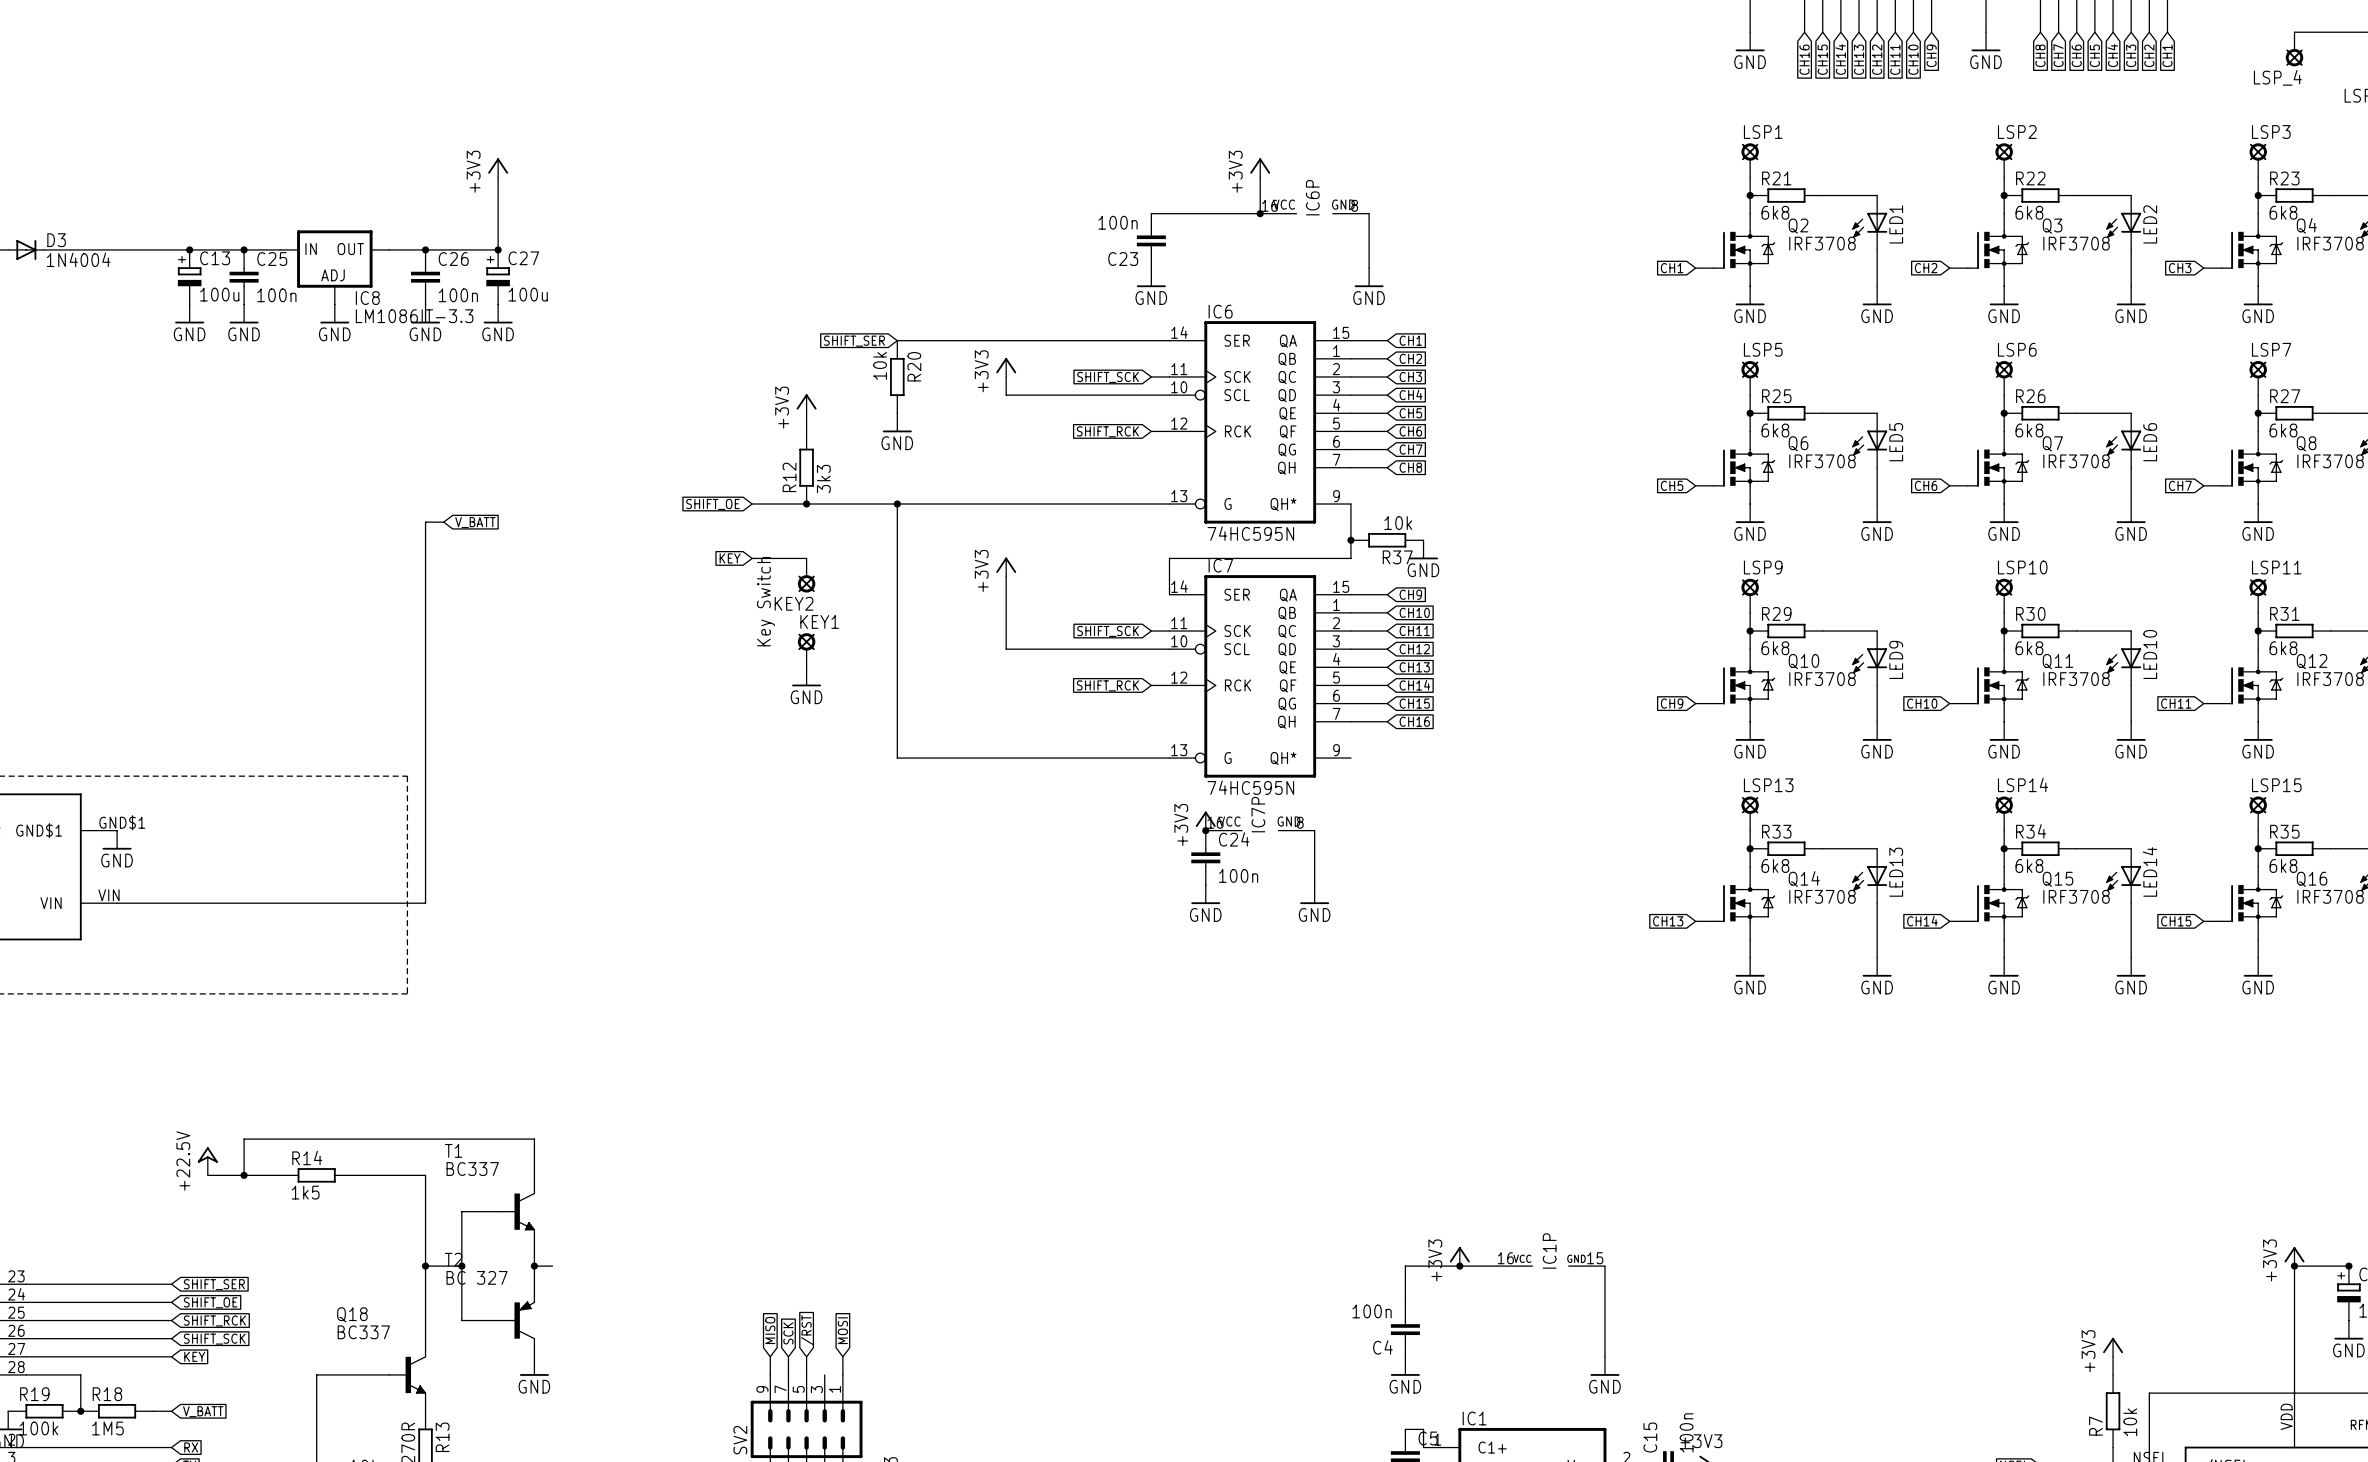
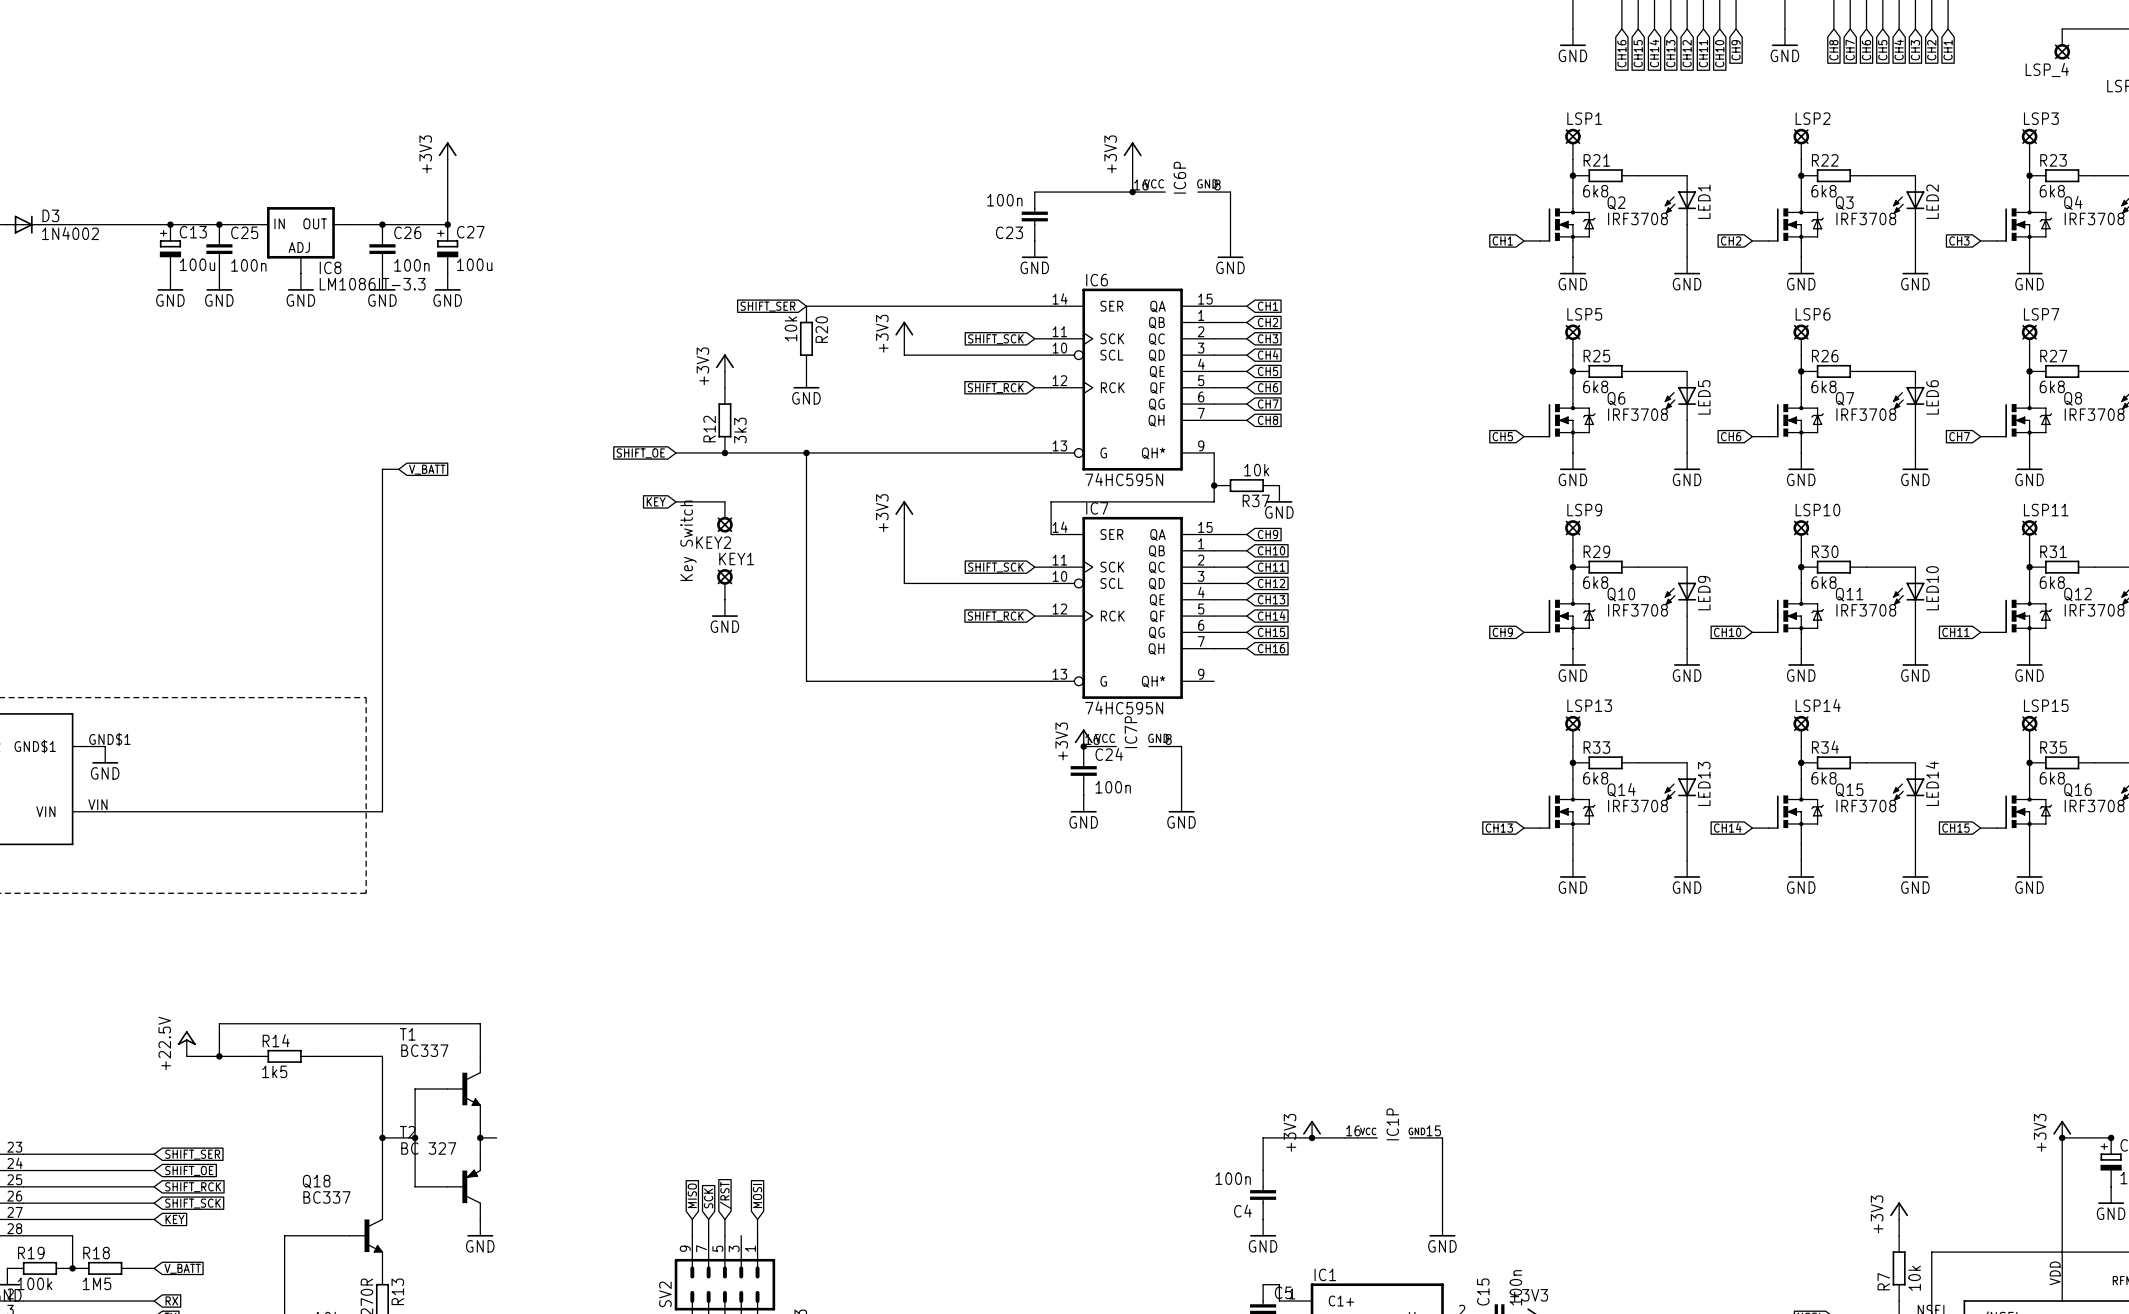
D3 value: 1N4004 (78, 259) -> 1N4002 (70, 233)

